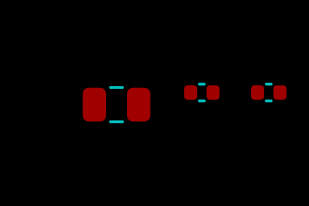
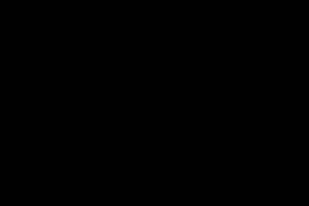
part: (201, 92) -> none
part: (268, 92) -> none
part: (116, 104) -> none

